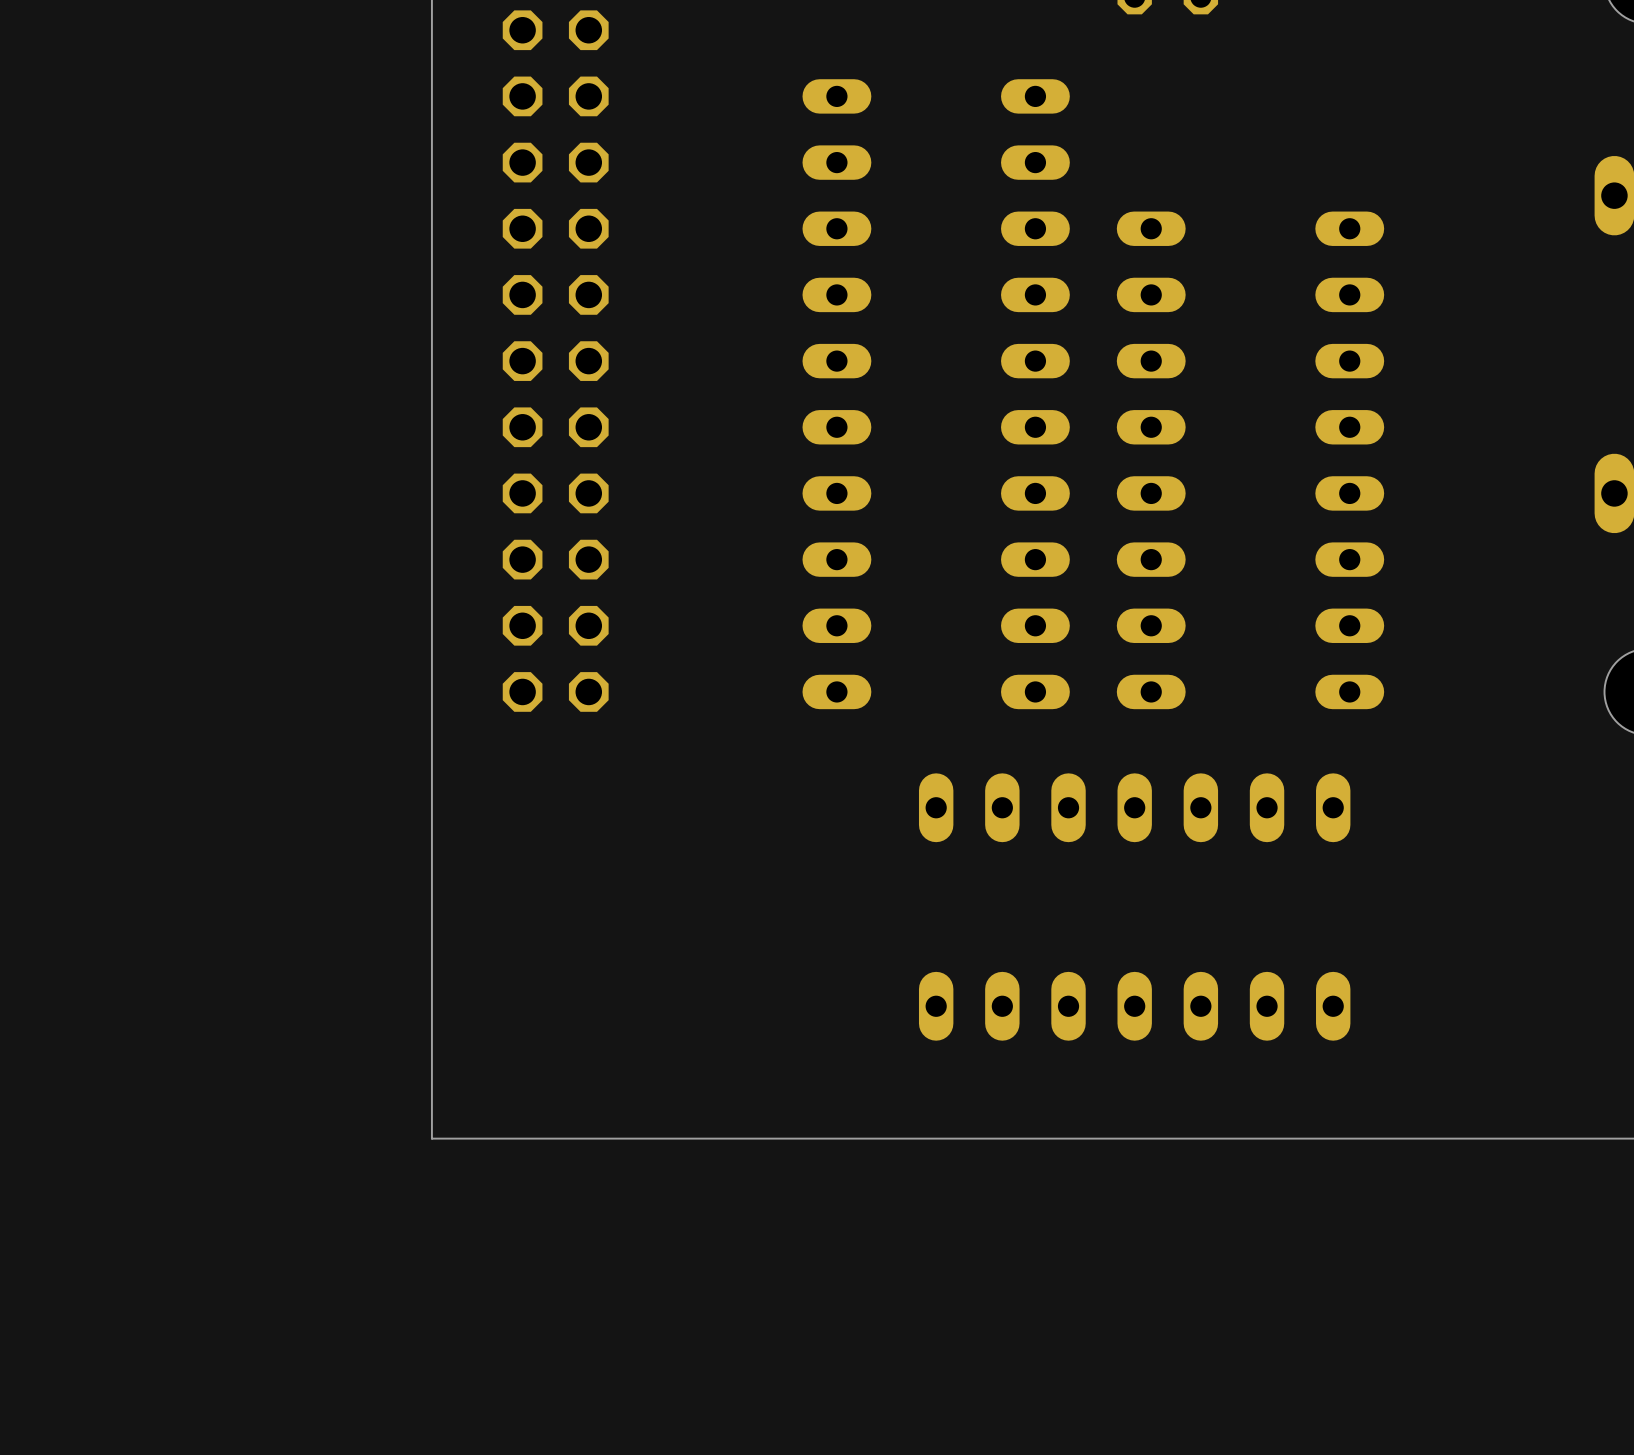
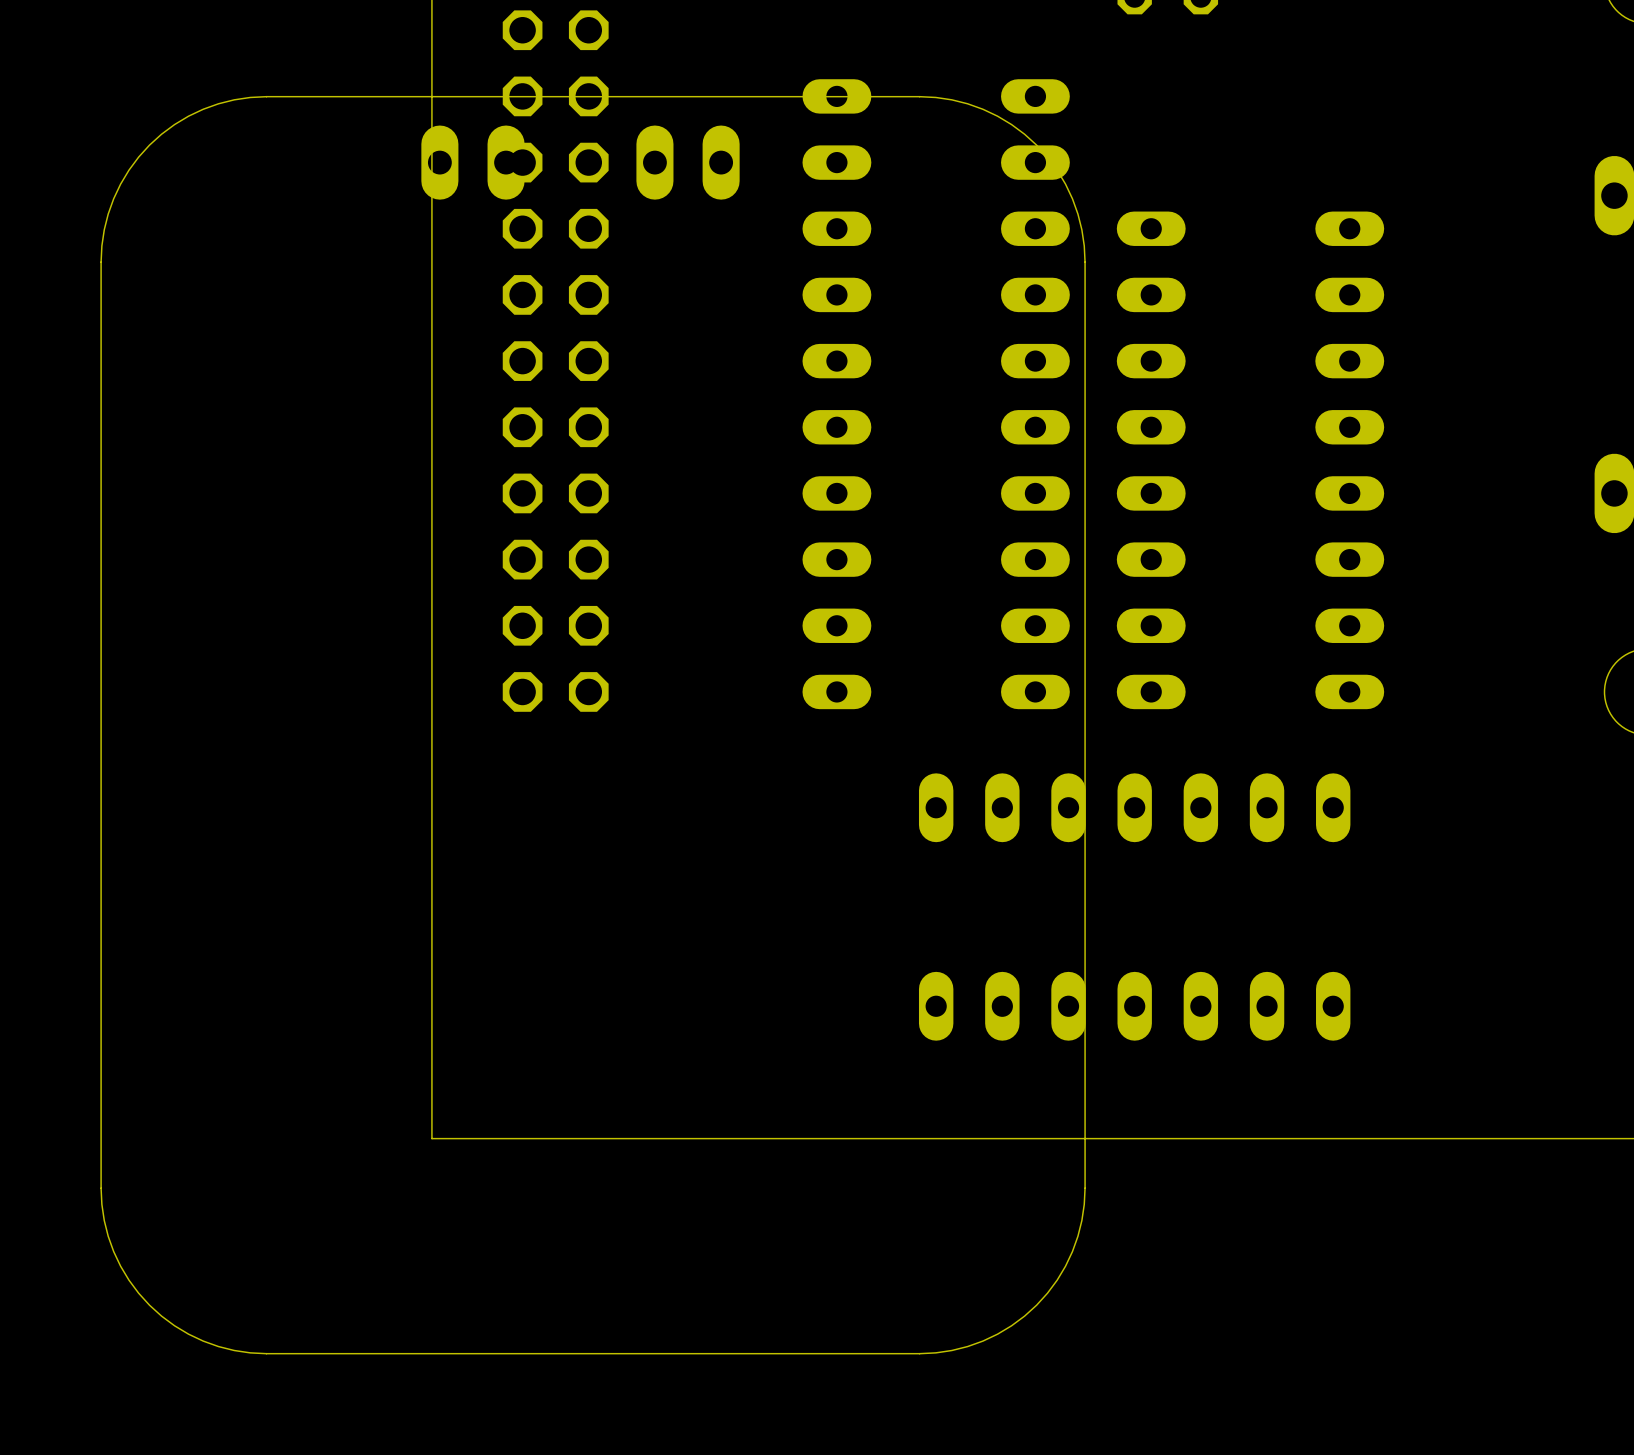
board edge: none -> (919, 96) (250, 97) (218, 103) (188, 116) (174, 124) (161, 134) (138, 157) (120, 184) (108, 214) (104, 229) (101, 262) (101, 1204) (108, 1236) (120, 1266) (128, 1280) (138, 1293) (161, 1316) (188, 1334) (218, 1346) (234, 1350) (266, 1353) (935, 1352) (967, 1346) (997, 1334) (1011, 1325) (1024, 1316) (1047, 1293) (1065, 1266) (1077, 1236) (1081, 1220) (1085, 1188) (1084, 245) (1077, 214) (1065, 184) (1047, 157) (1024, 134) (997, 116) (967, 103) (951, 99) (919, 96)
part: none -> (472, 162)
part: none -> (688, 162)

